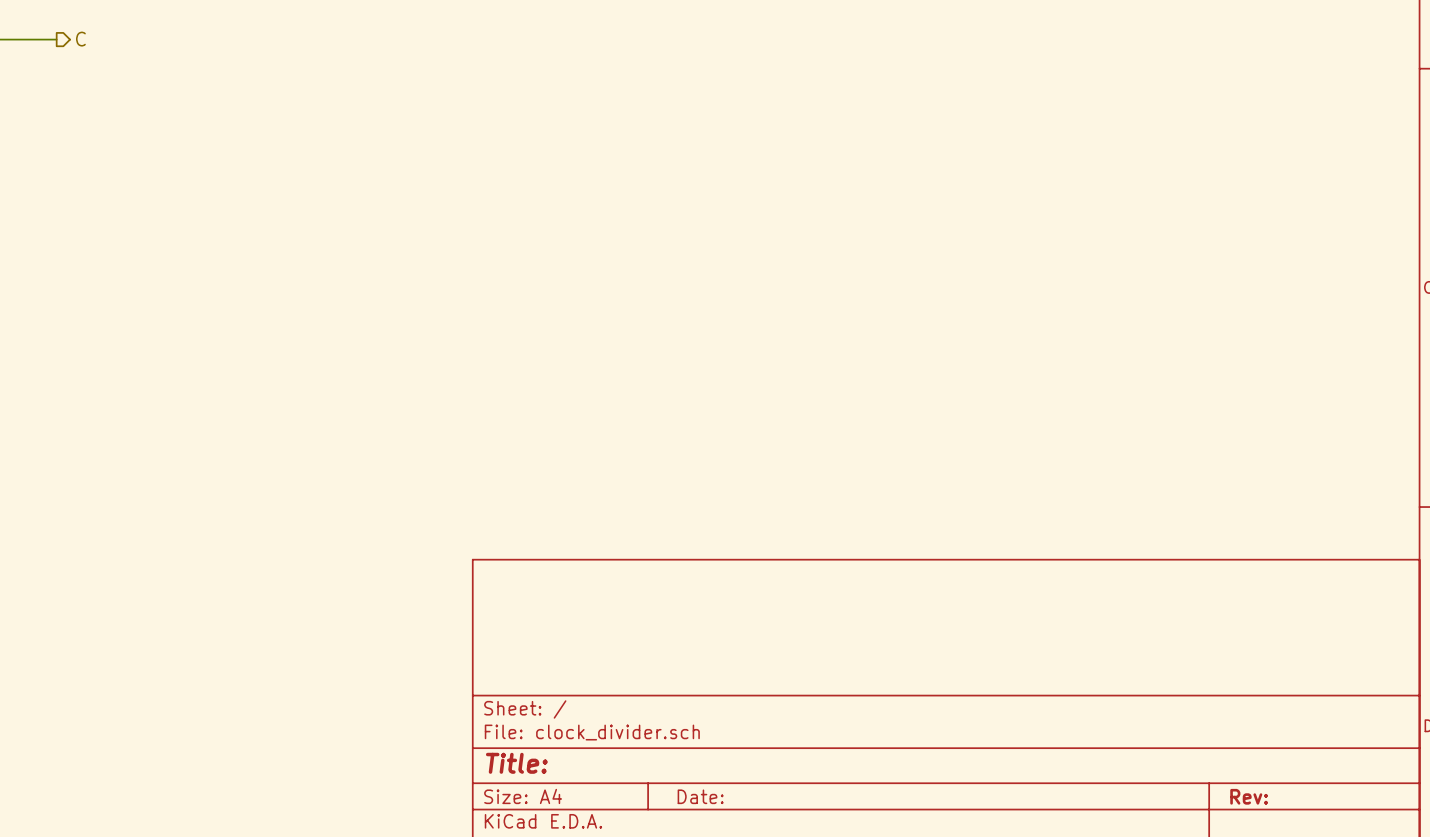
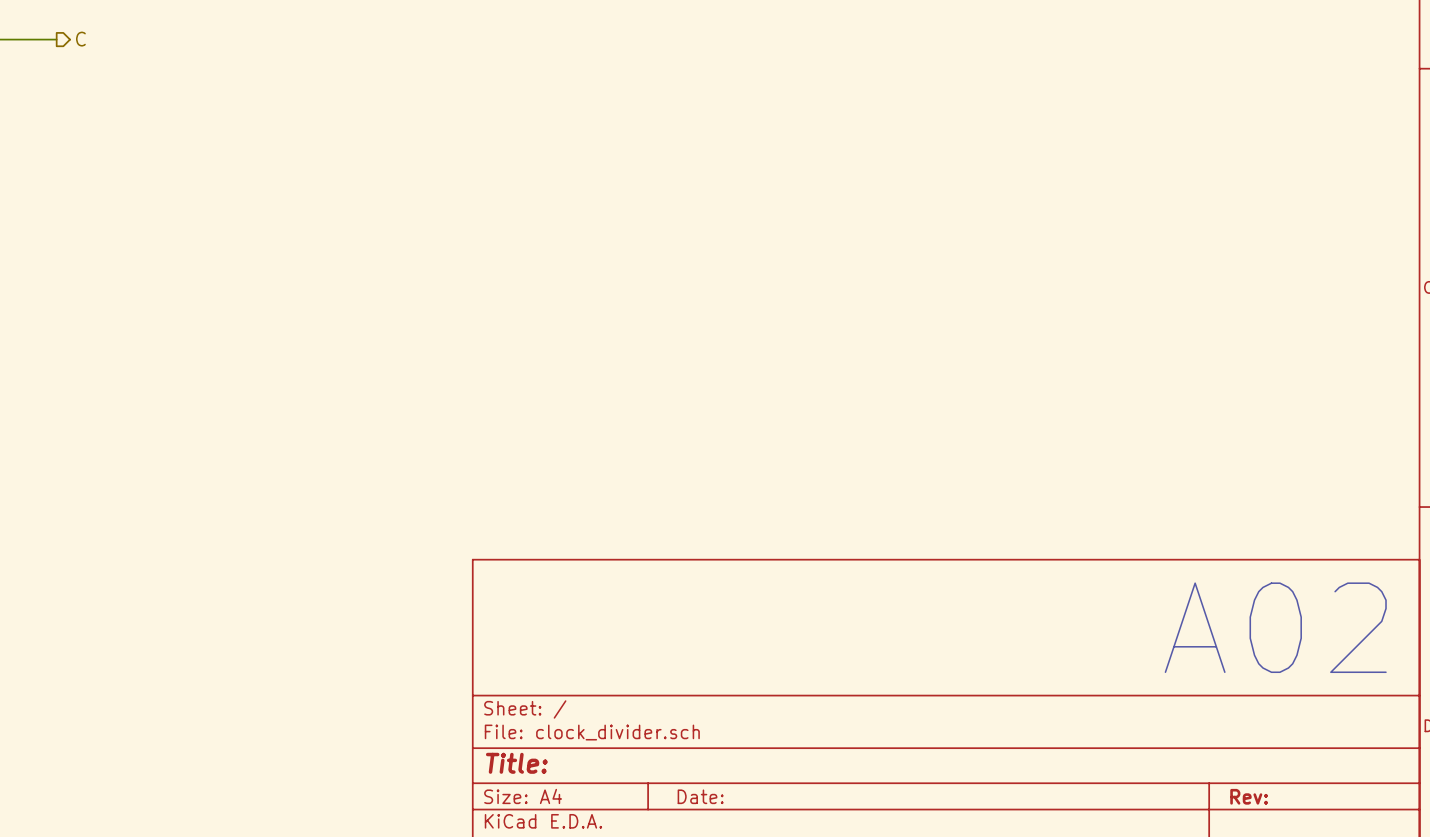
text: none -> A02 (1275, 627)

